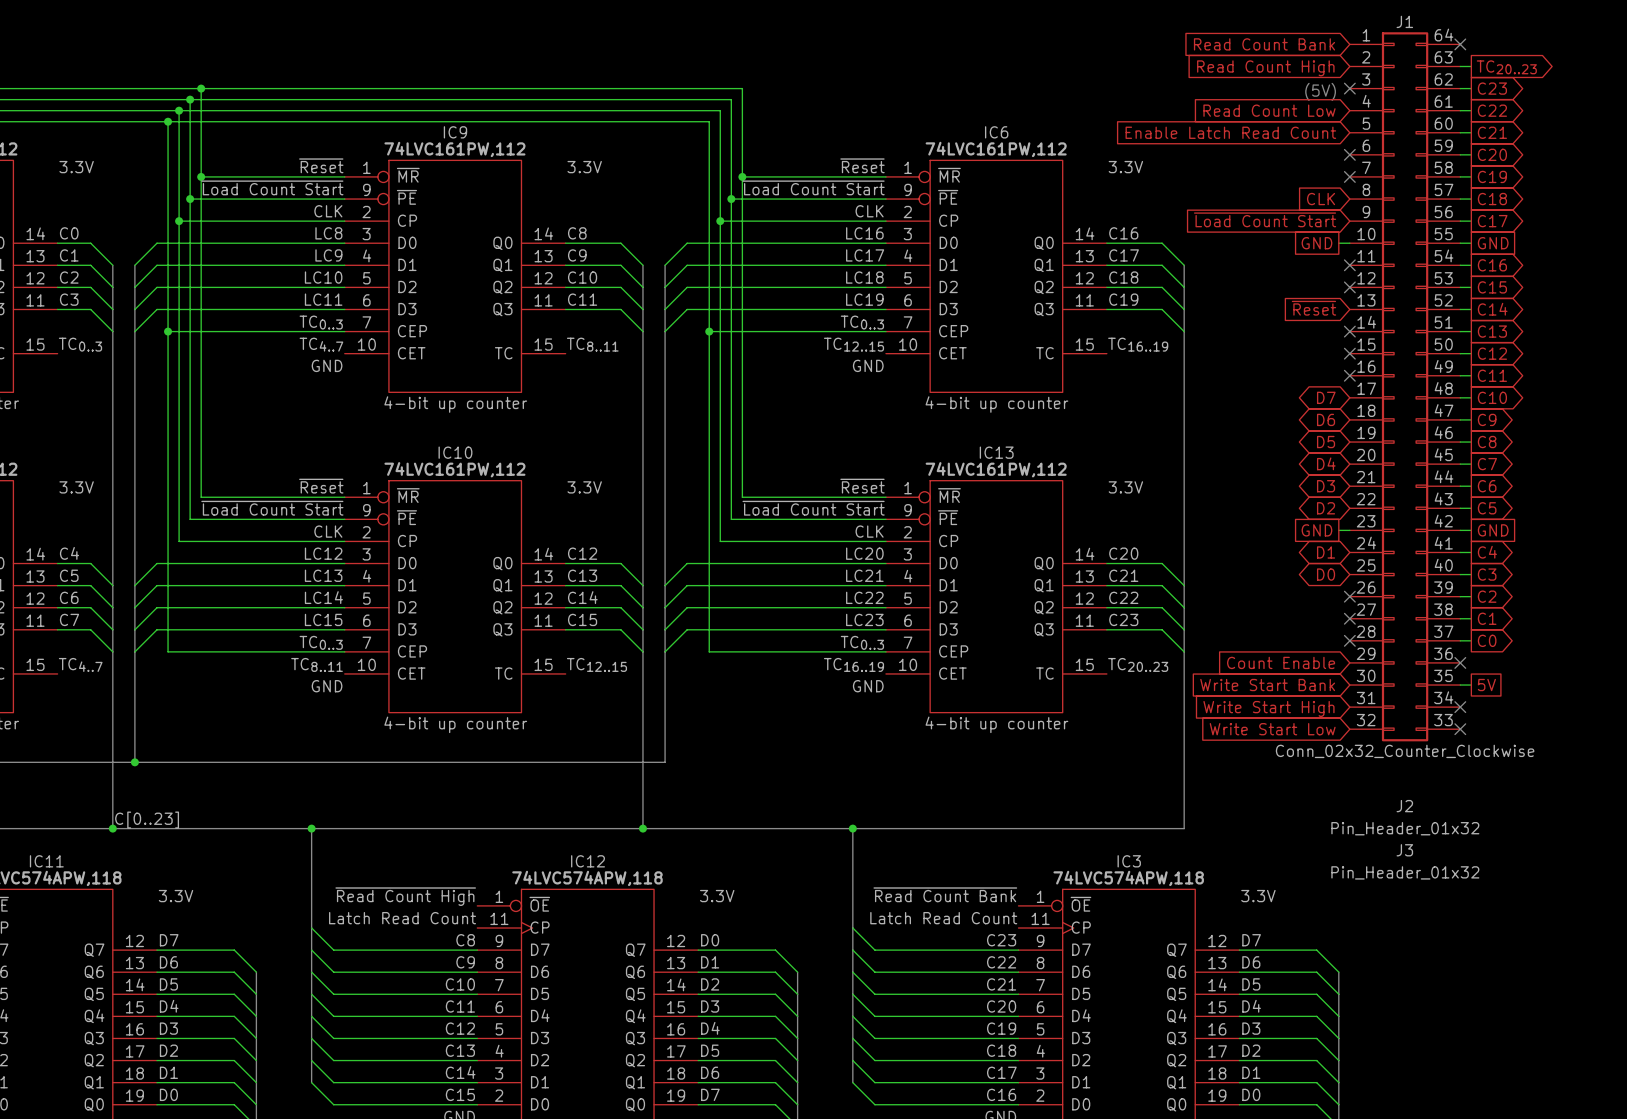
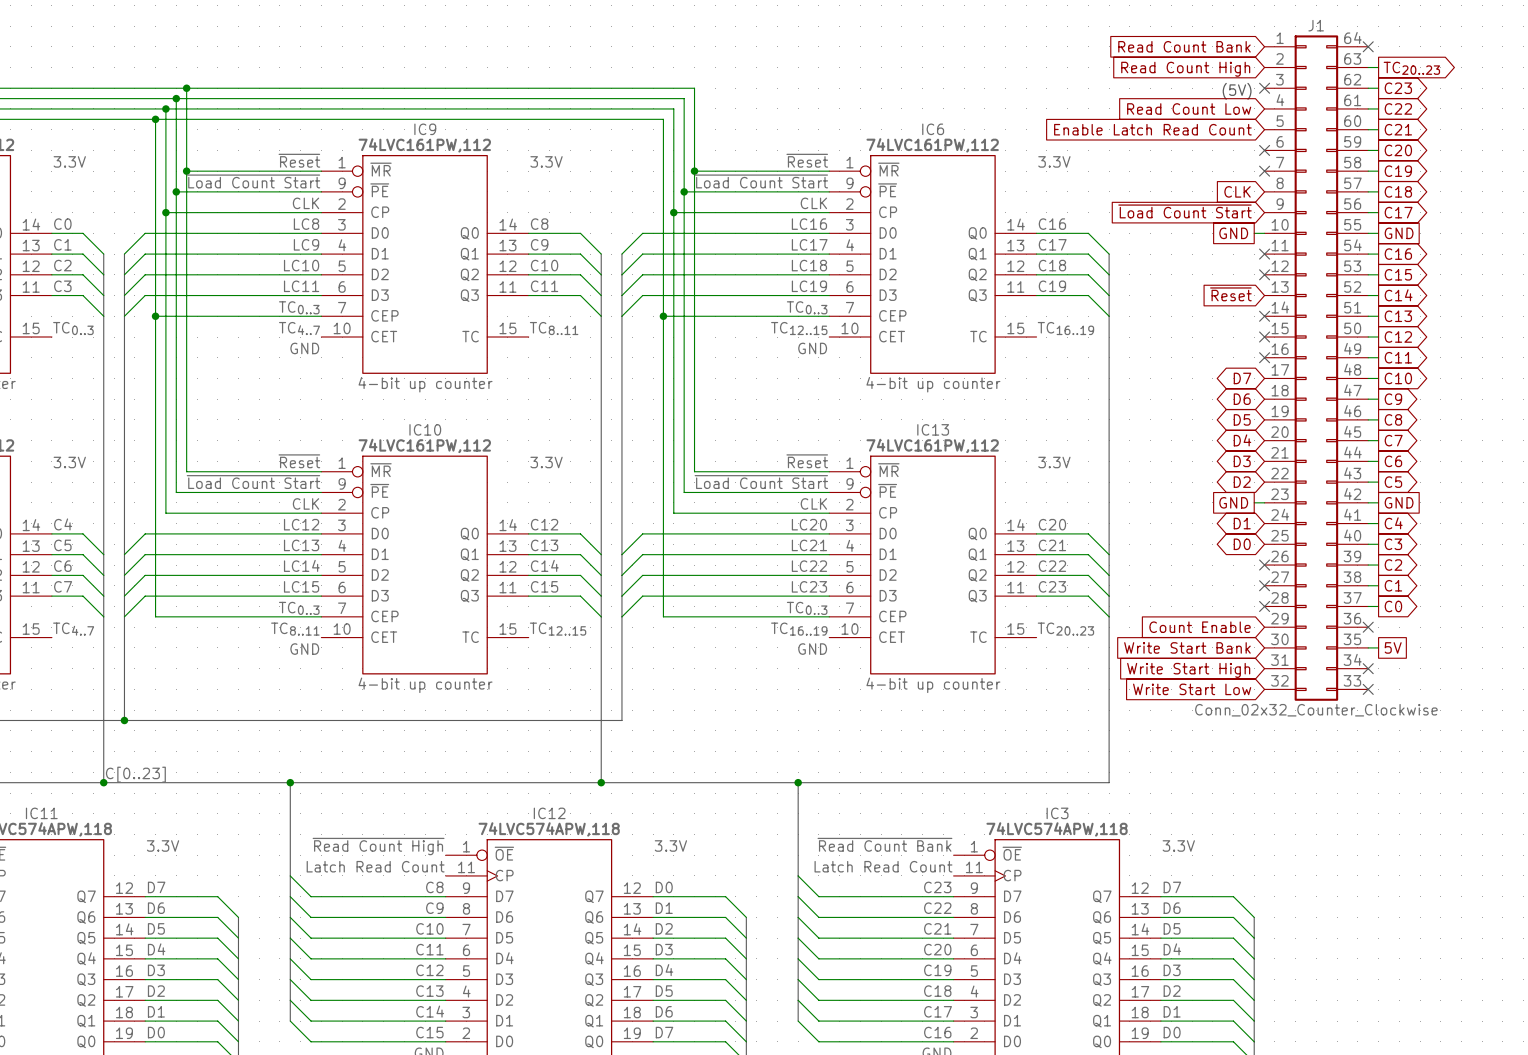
J2: Pin_Header_01x32 (1405, 817) -> none
J3: Pin_Header_01x32 (1405, 861) -> none

